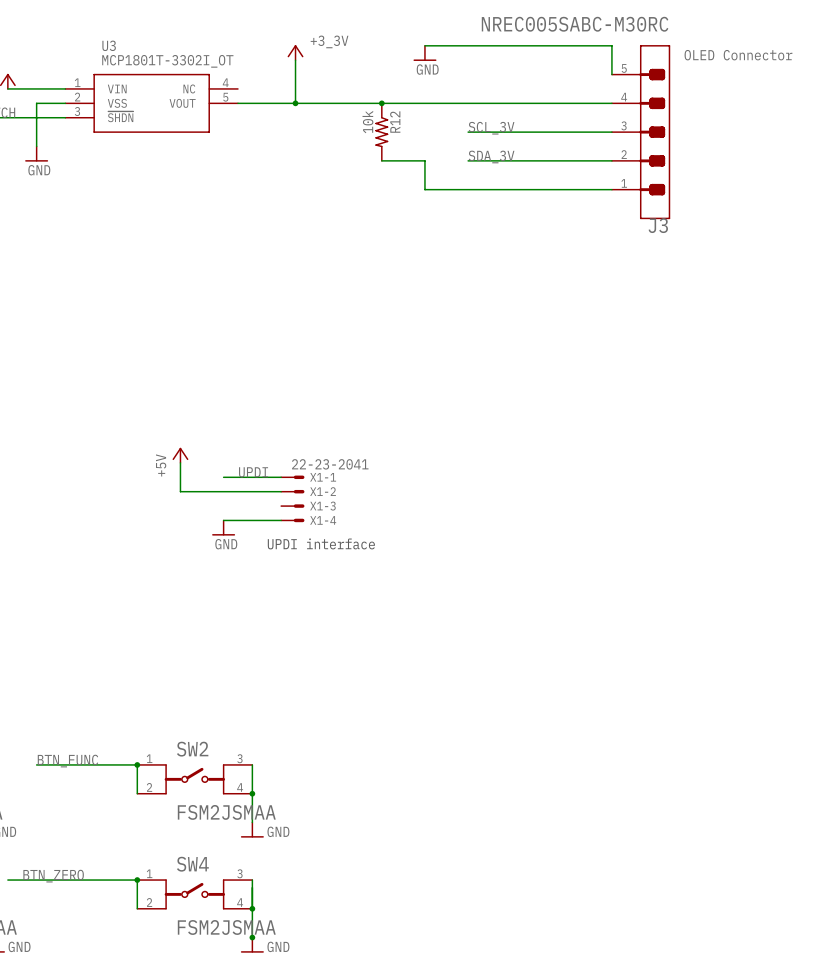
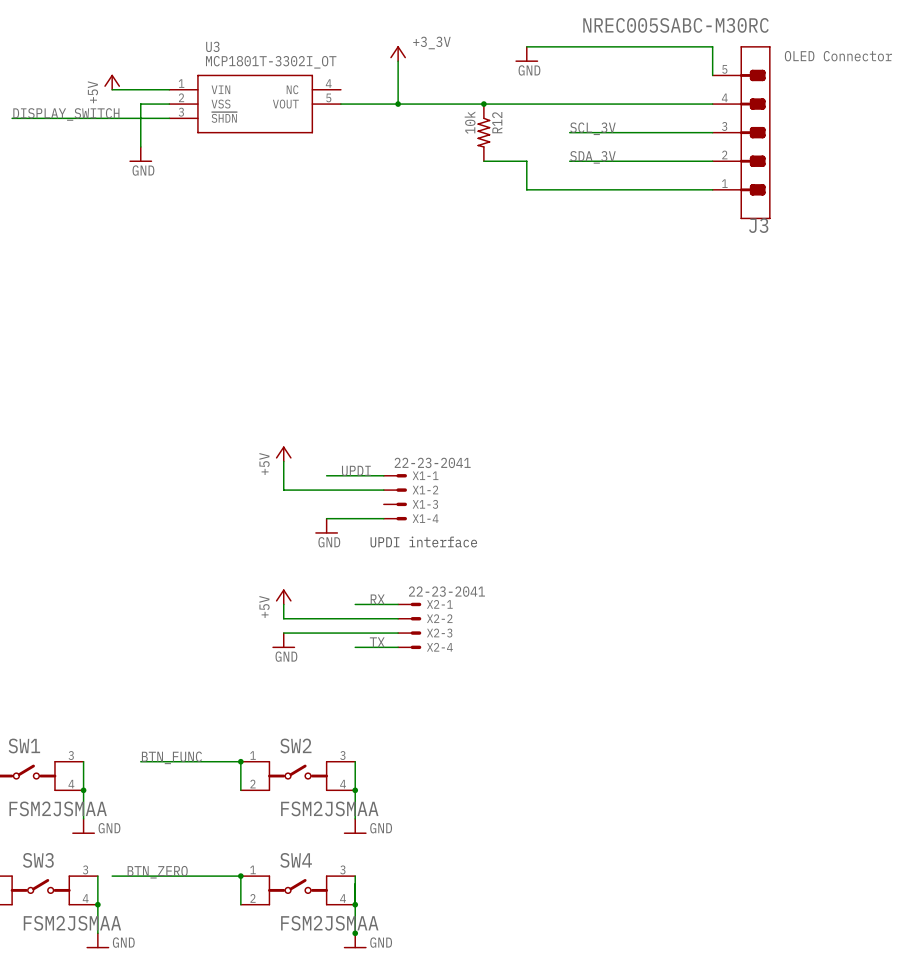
power symbol: none -> +5V (283, 596)
label: none -> RX (377, 599)
wire: none -> (283, 604) (283, 618) (398, 618)
wire: none -> (355, 604) (398, 604)
X2-1: none -> 22-23-2041 (409, 604)
X2-2: none -> (409, 618)
wire: none -> (283, 633) (398, 633)
X2-3: none -> (409, 633)
power symbol: none -> GND (283, 640)
label: none -> TX (377, 642)
wire: none -> (355, 647) (398, 647)
X2-4: none -> (409, 647)

